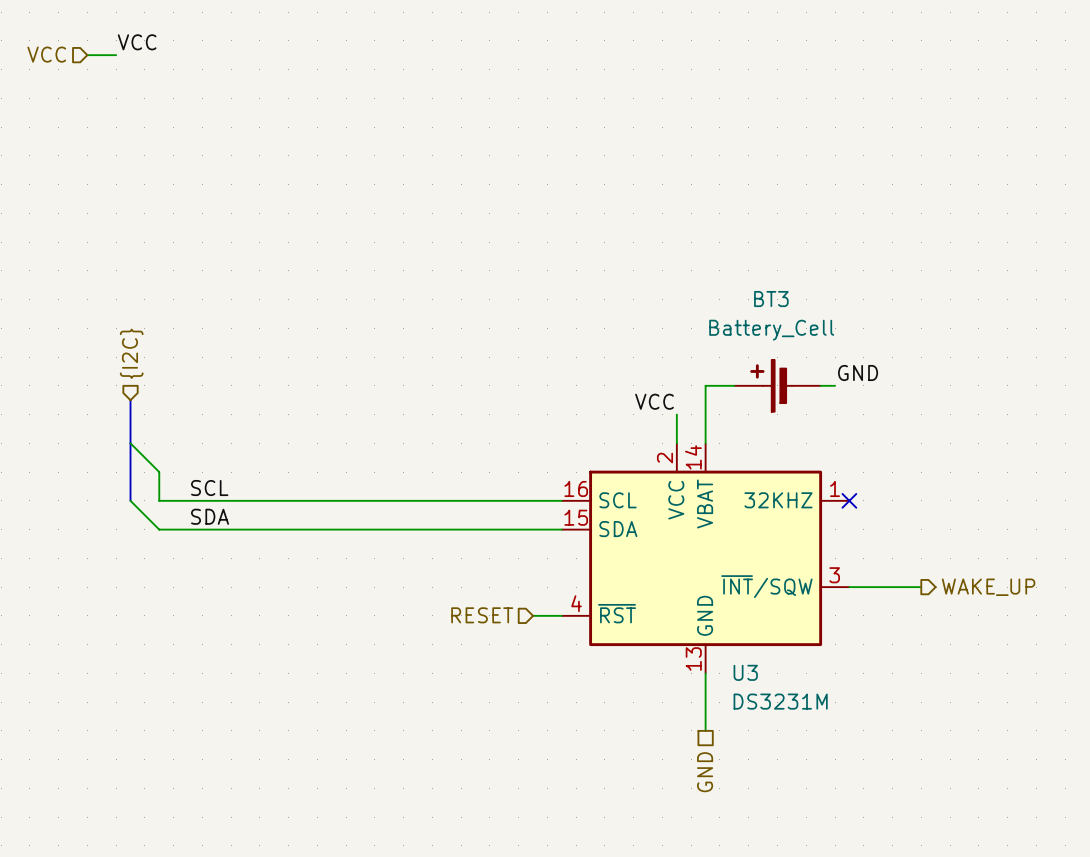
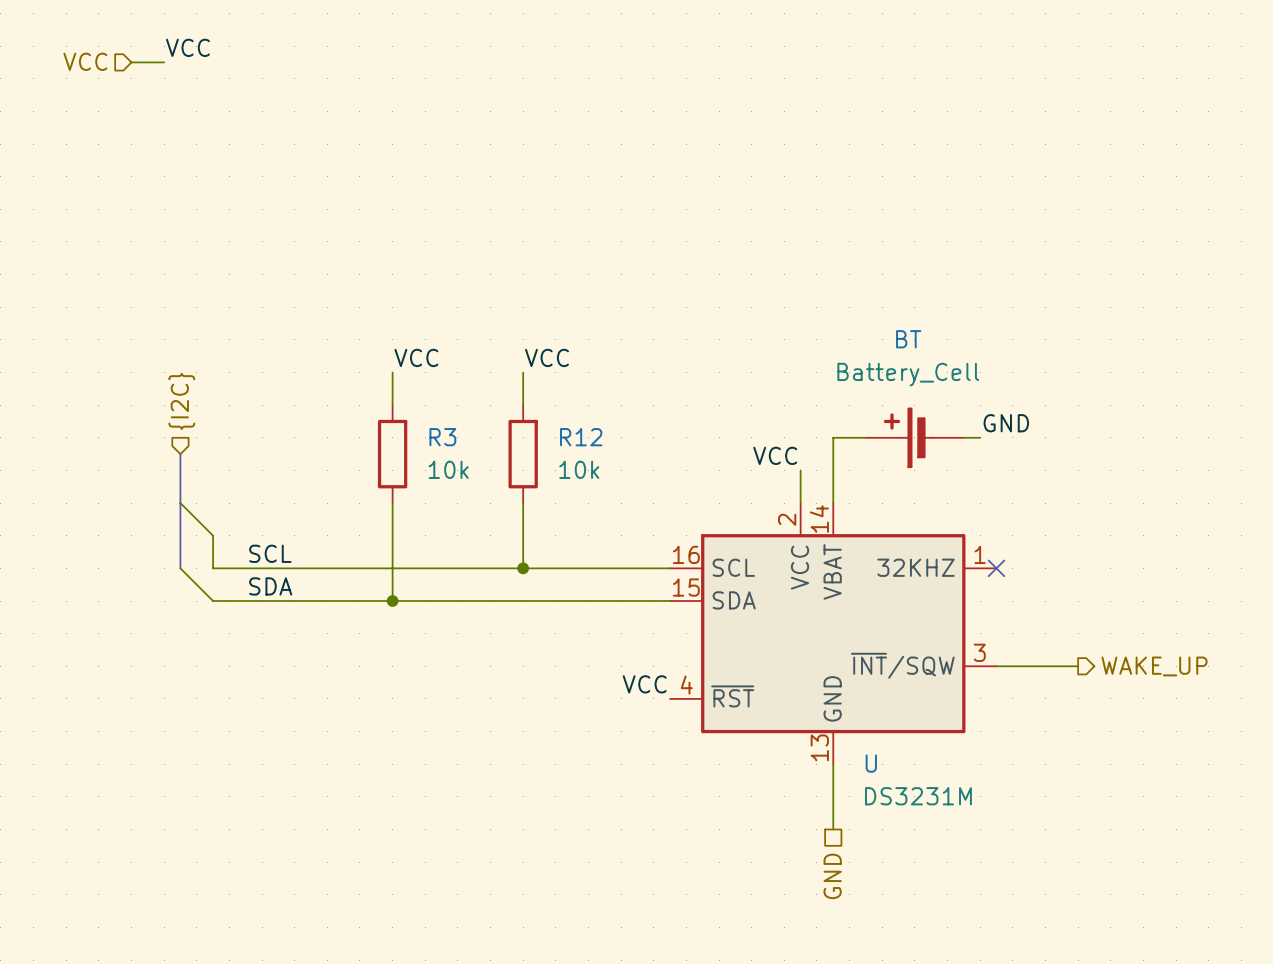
BT3 name: BT3 (771, 299) -> BT (908, 339)
label: none -> VCC (416, 357)
label: none -> VCC (547, 357)
wire: none -> (392, 372) (392, 405)
wire: none -> (523, 372) (523, 405)
R3: none -> 10k (392, 454)
R12: none -> 10k (523, 454)
wire: none -> (392, 503) (392, 601)
wire: none -> (523, 503) (523, 568)
junction: none -> (523, 568)
junction: none -> (392, 601)
label: none -> VCC (644, 684)
hierarchical label: RESET (482, 615) -> none
wire: (533, 615) (561, 615) -> none
U3 name: U3 (745, 672) -> U (871, 763)

